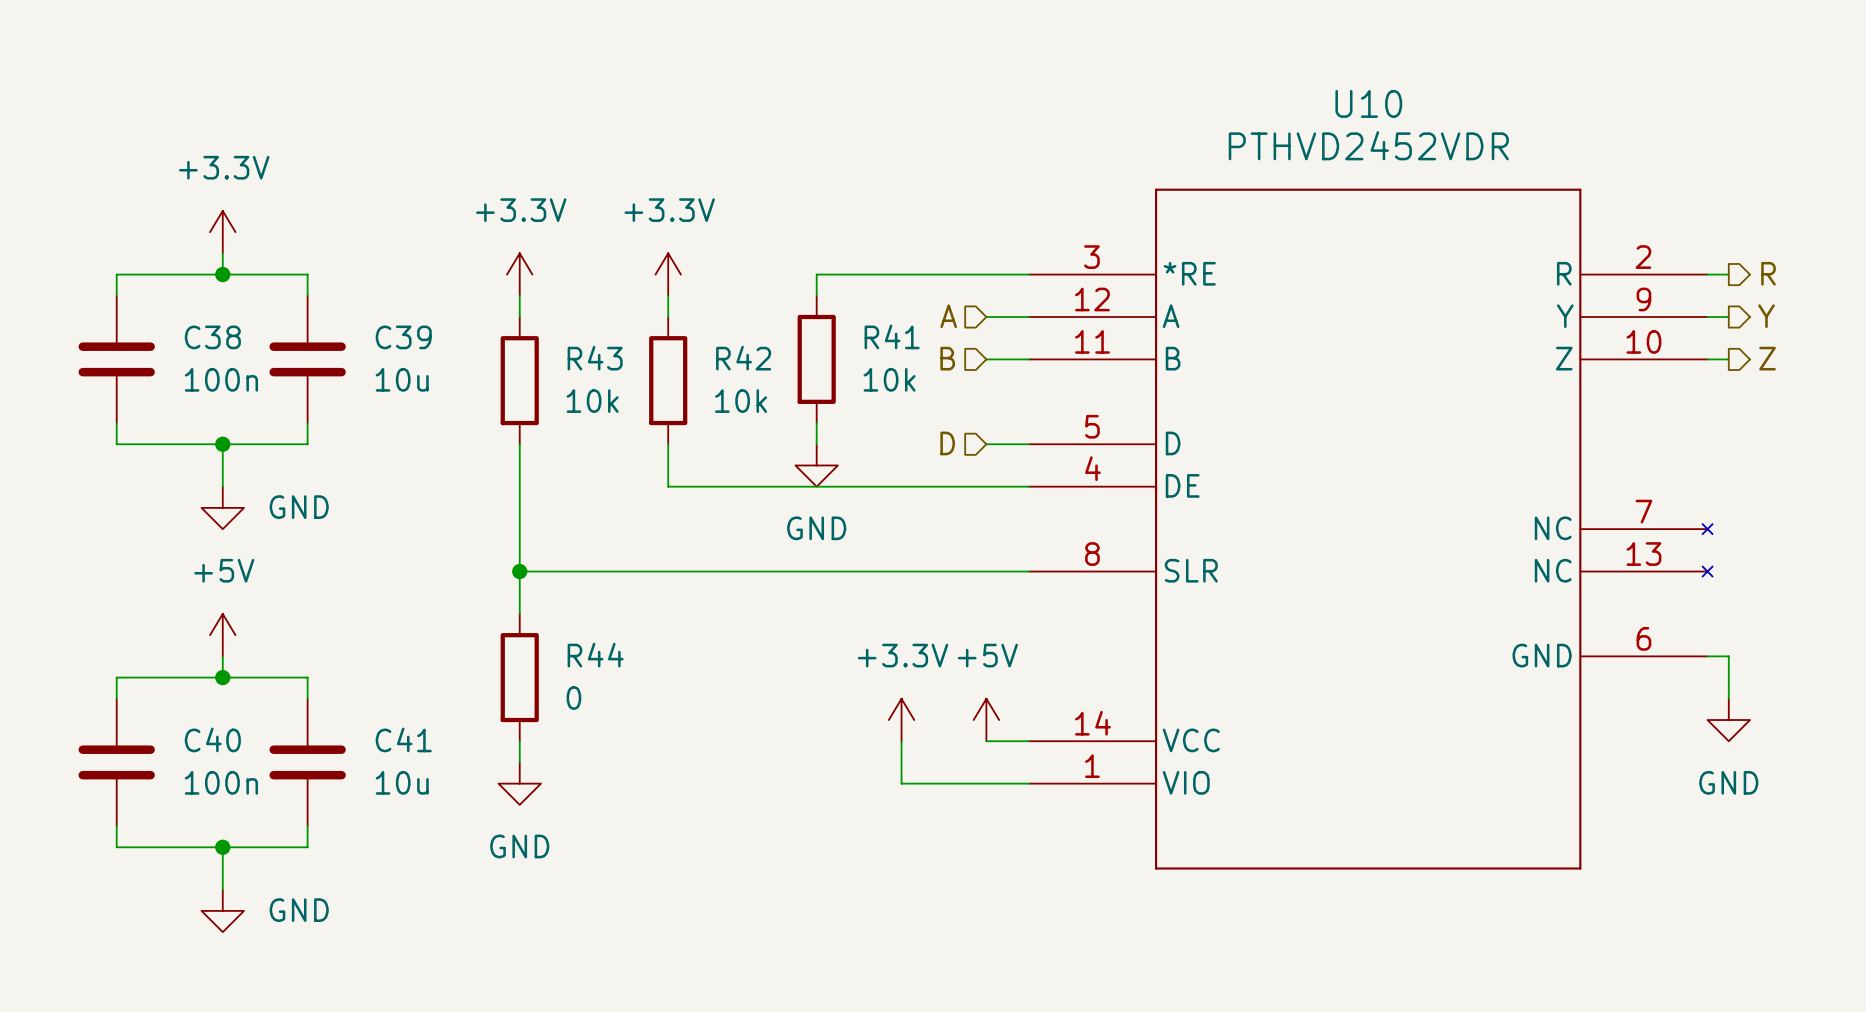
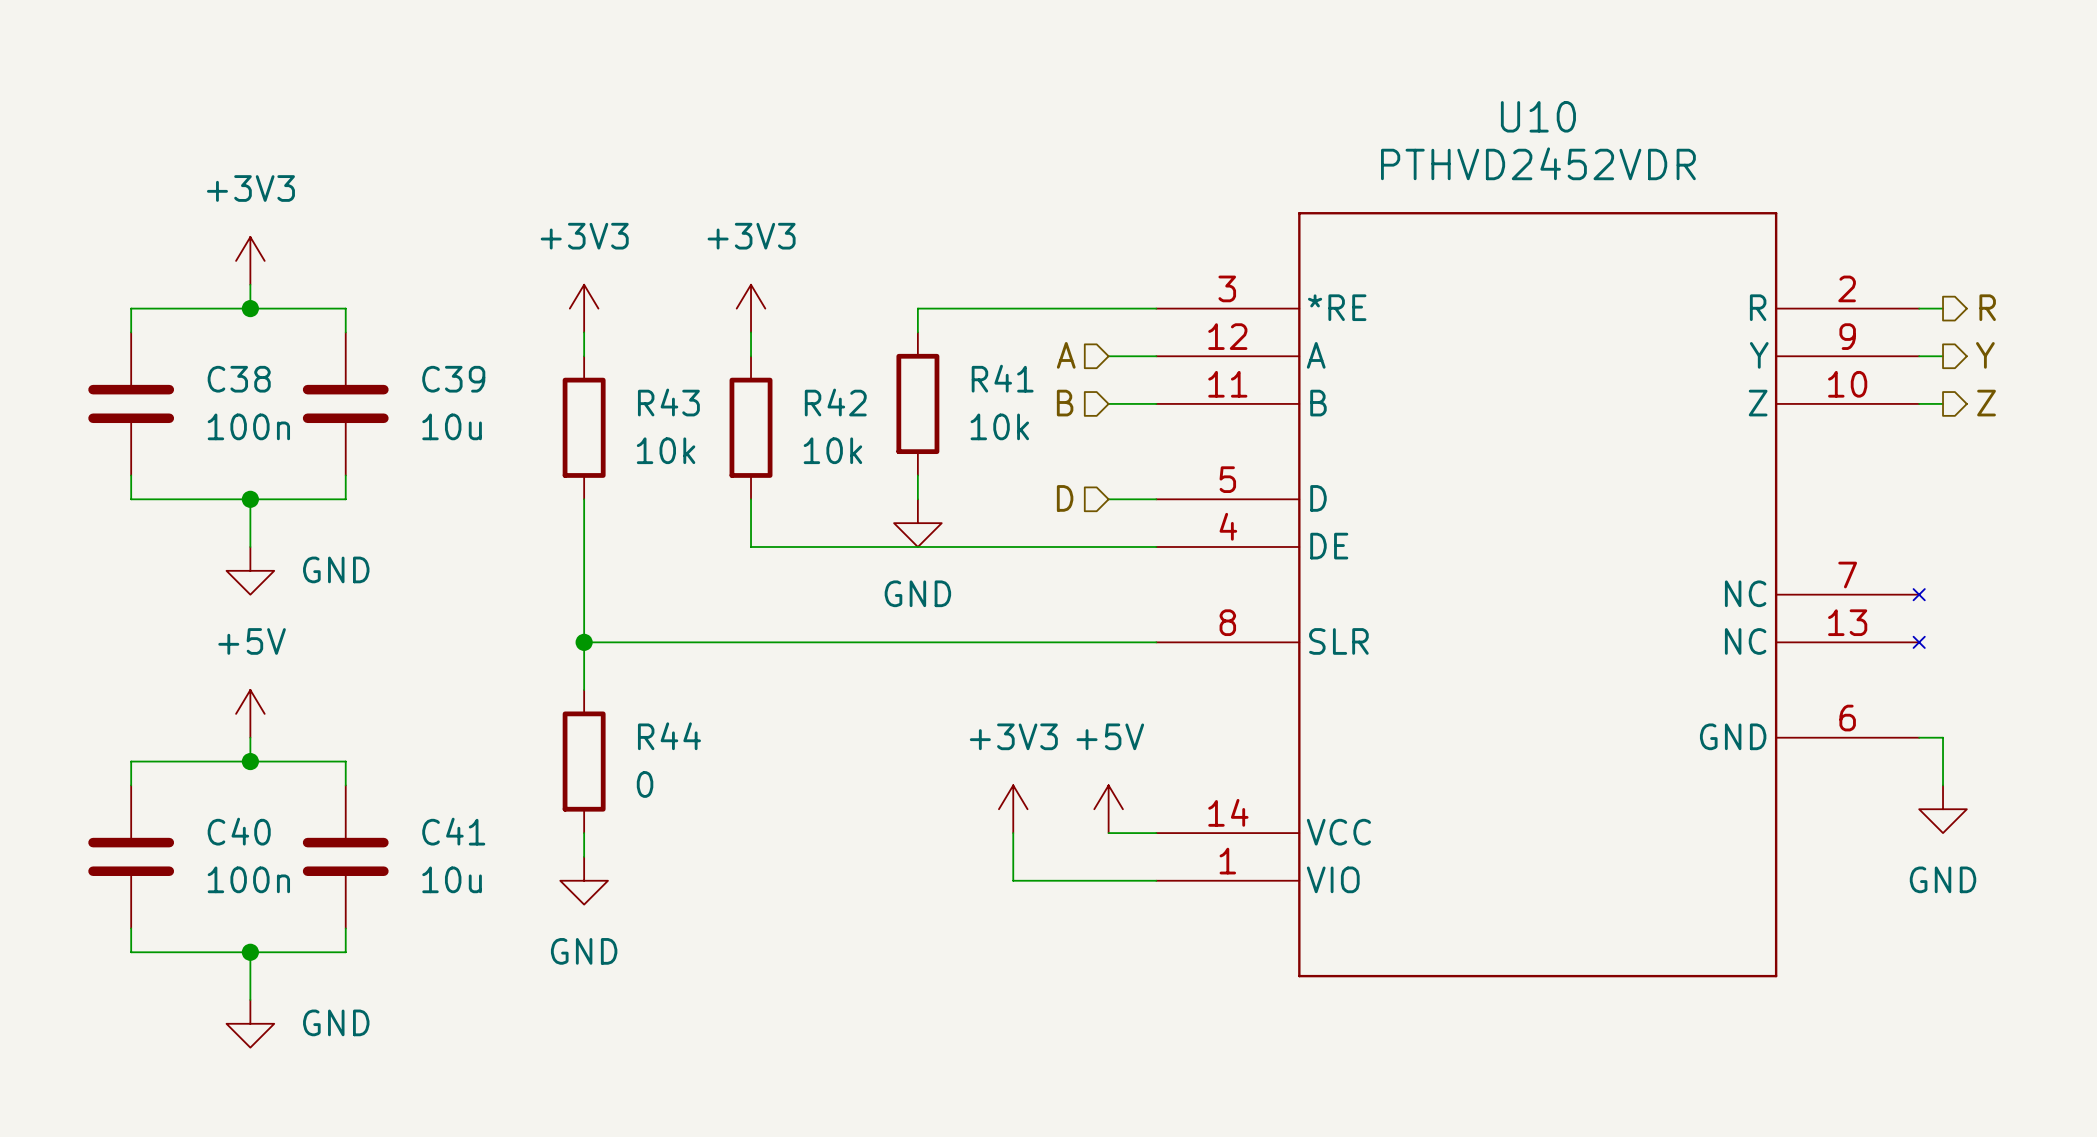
power symbol: +3.3V (222, 232) -> +3V3 (250, 260)
power symbol: +3.3V (519, 274) -> +3V3 (584, 308)
power symbol: +3.3V (668, 274) -> +3V3 (751, 308)
power symbol: +3.3V (901, 720) -> +3V3 (1013, 809)

